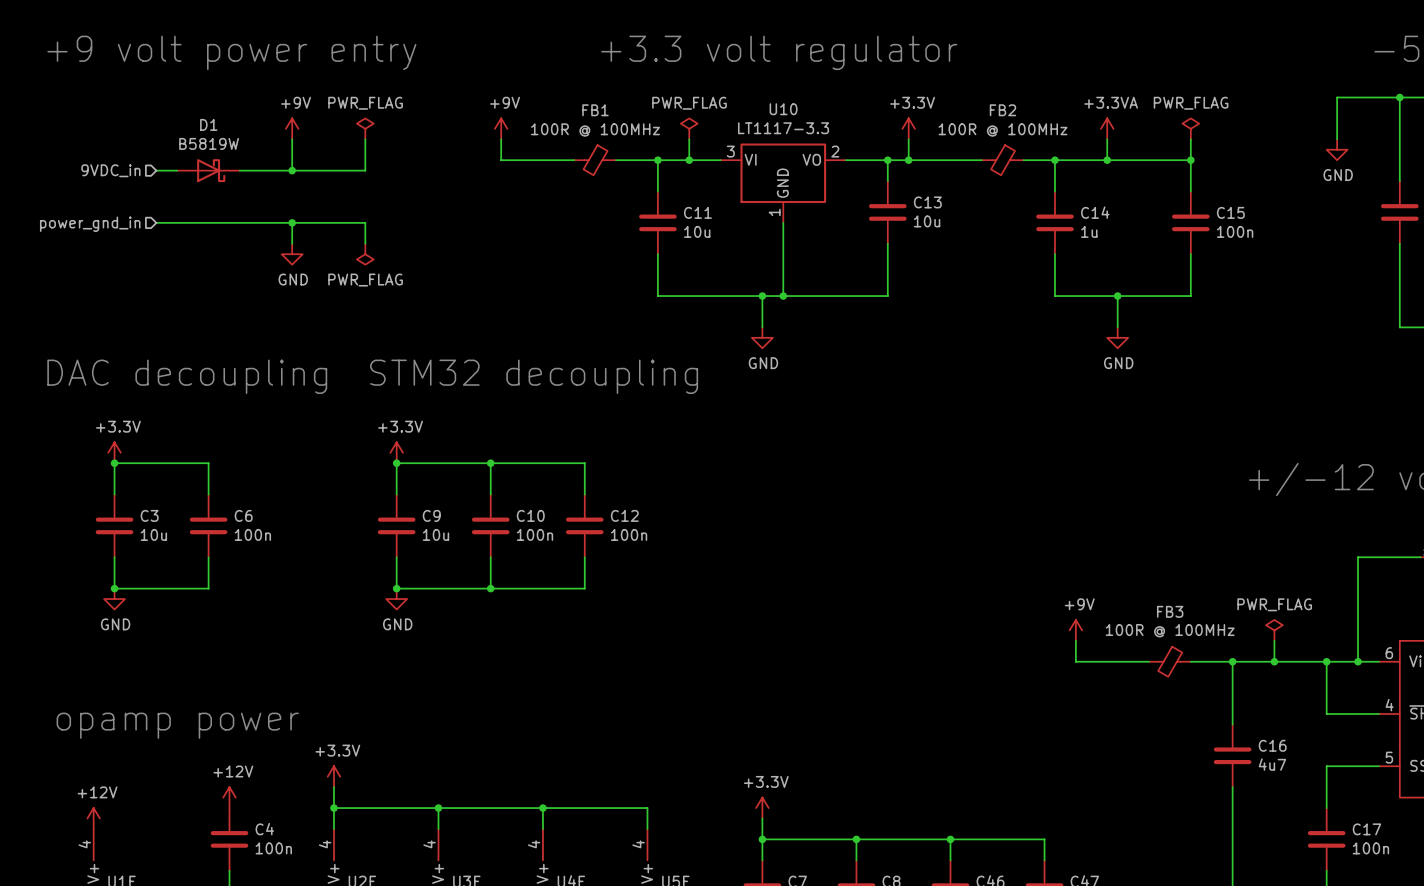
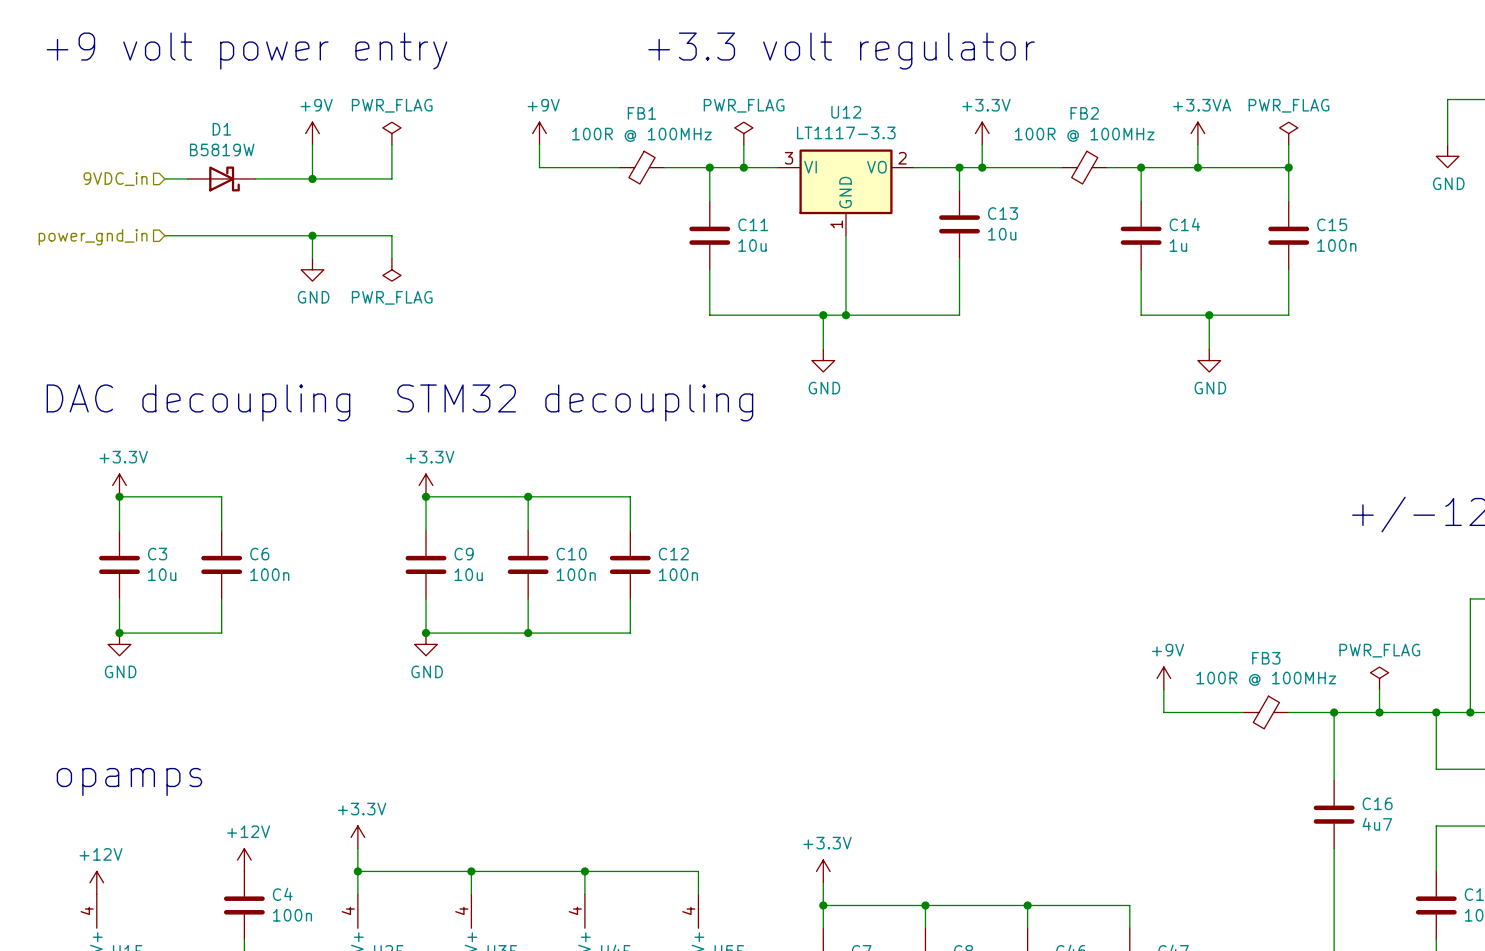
U10 name: U10 (783, 109) -> U12 (846, 112)
text: opamp power (177, 725) -> opamps (129, 781)

